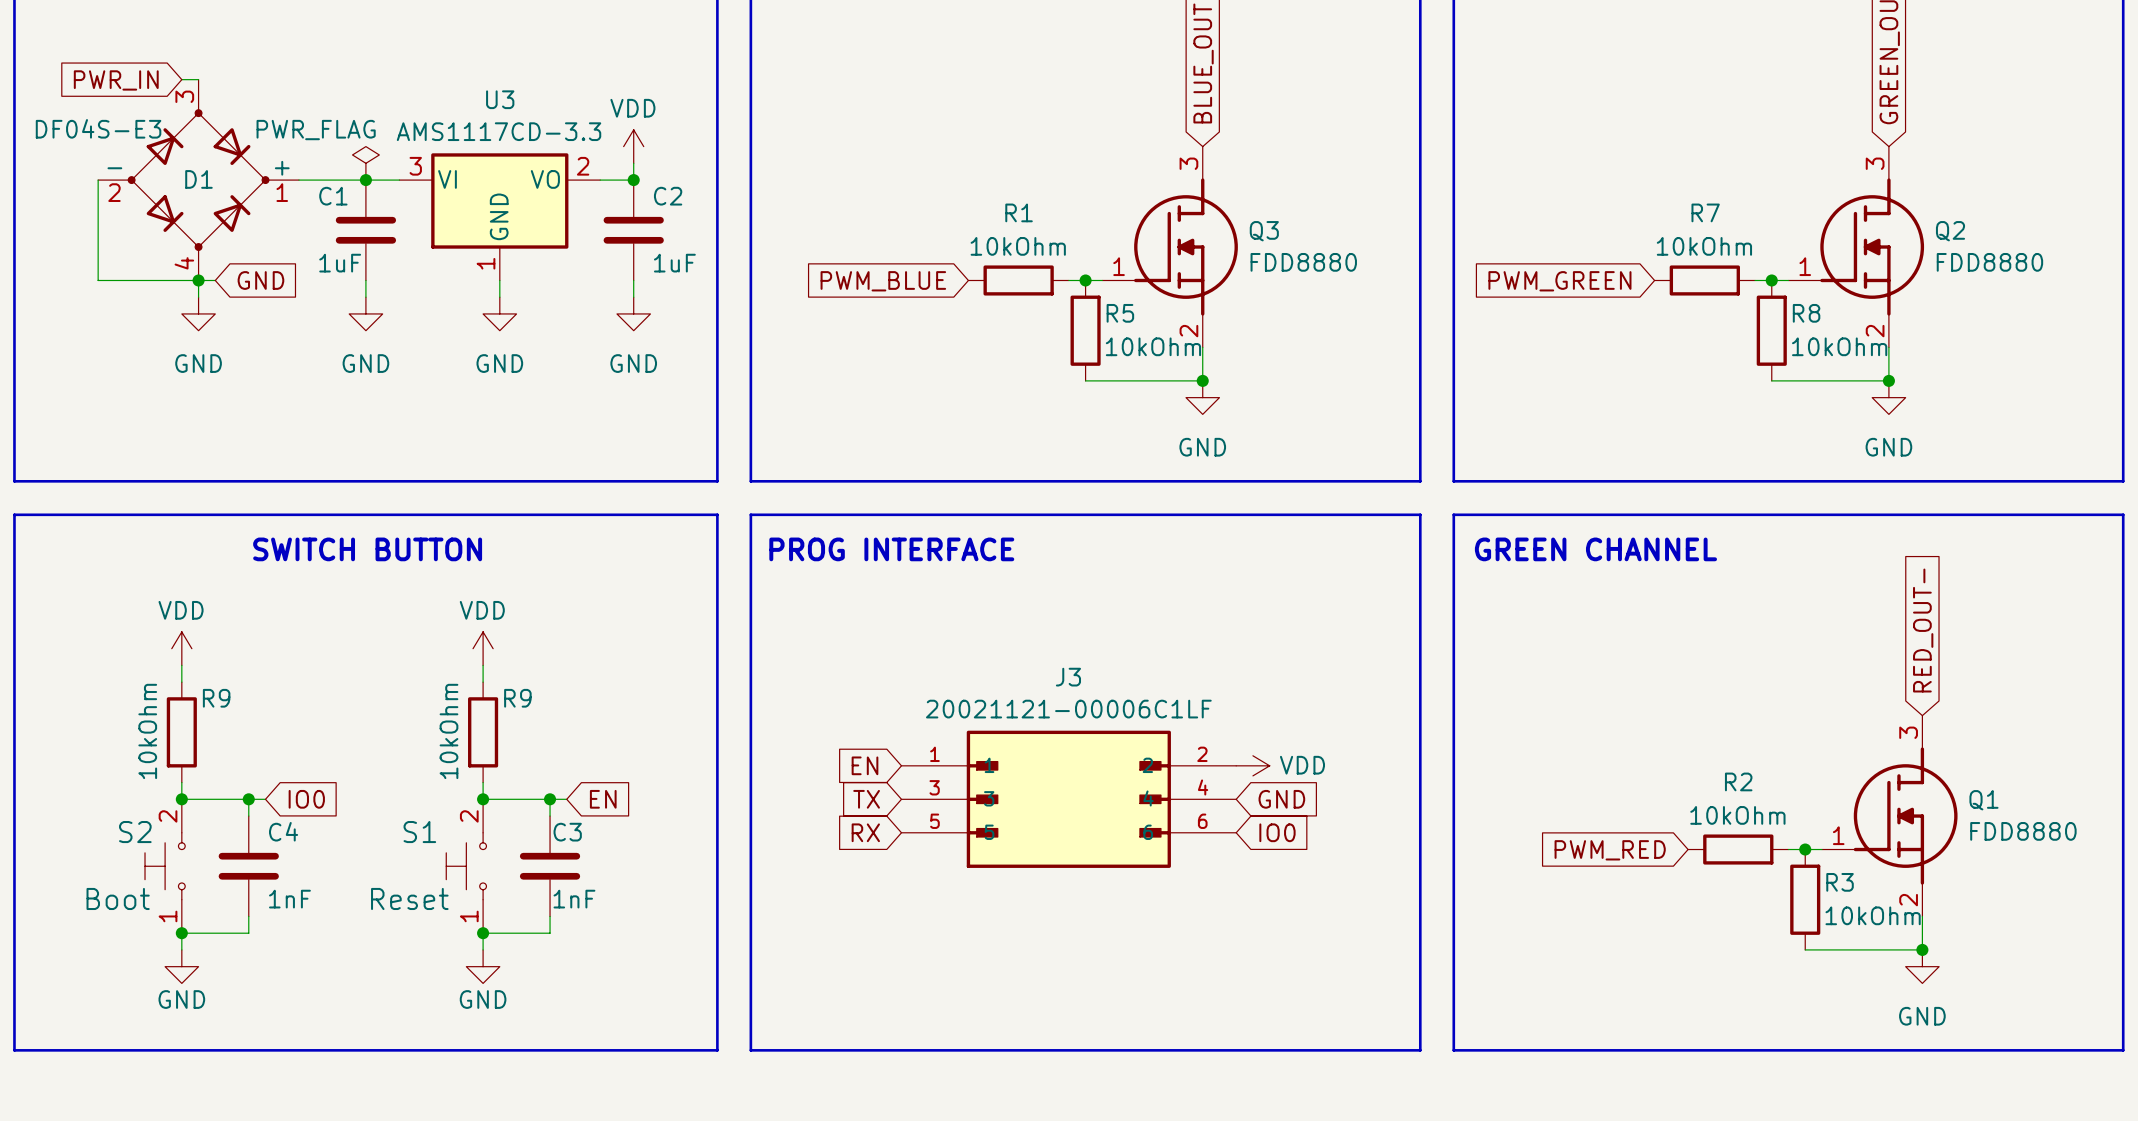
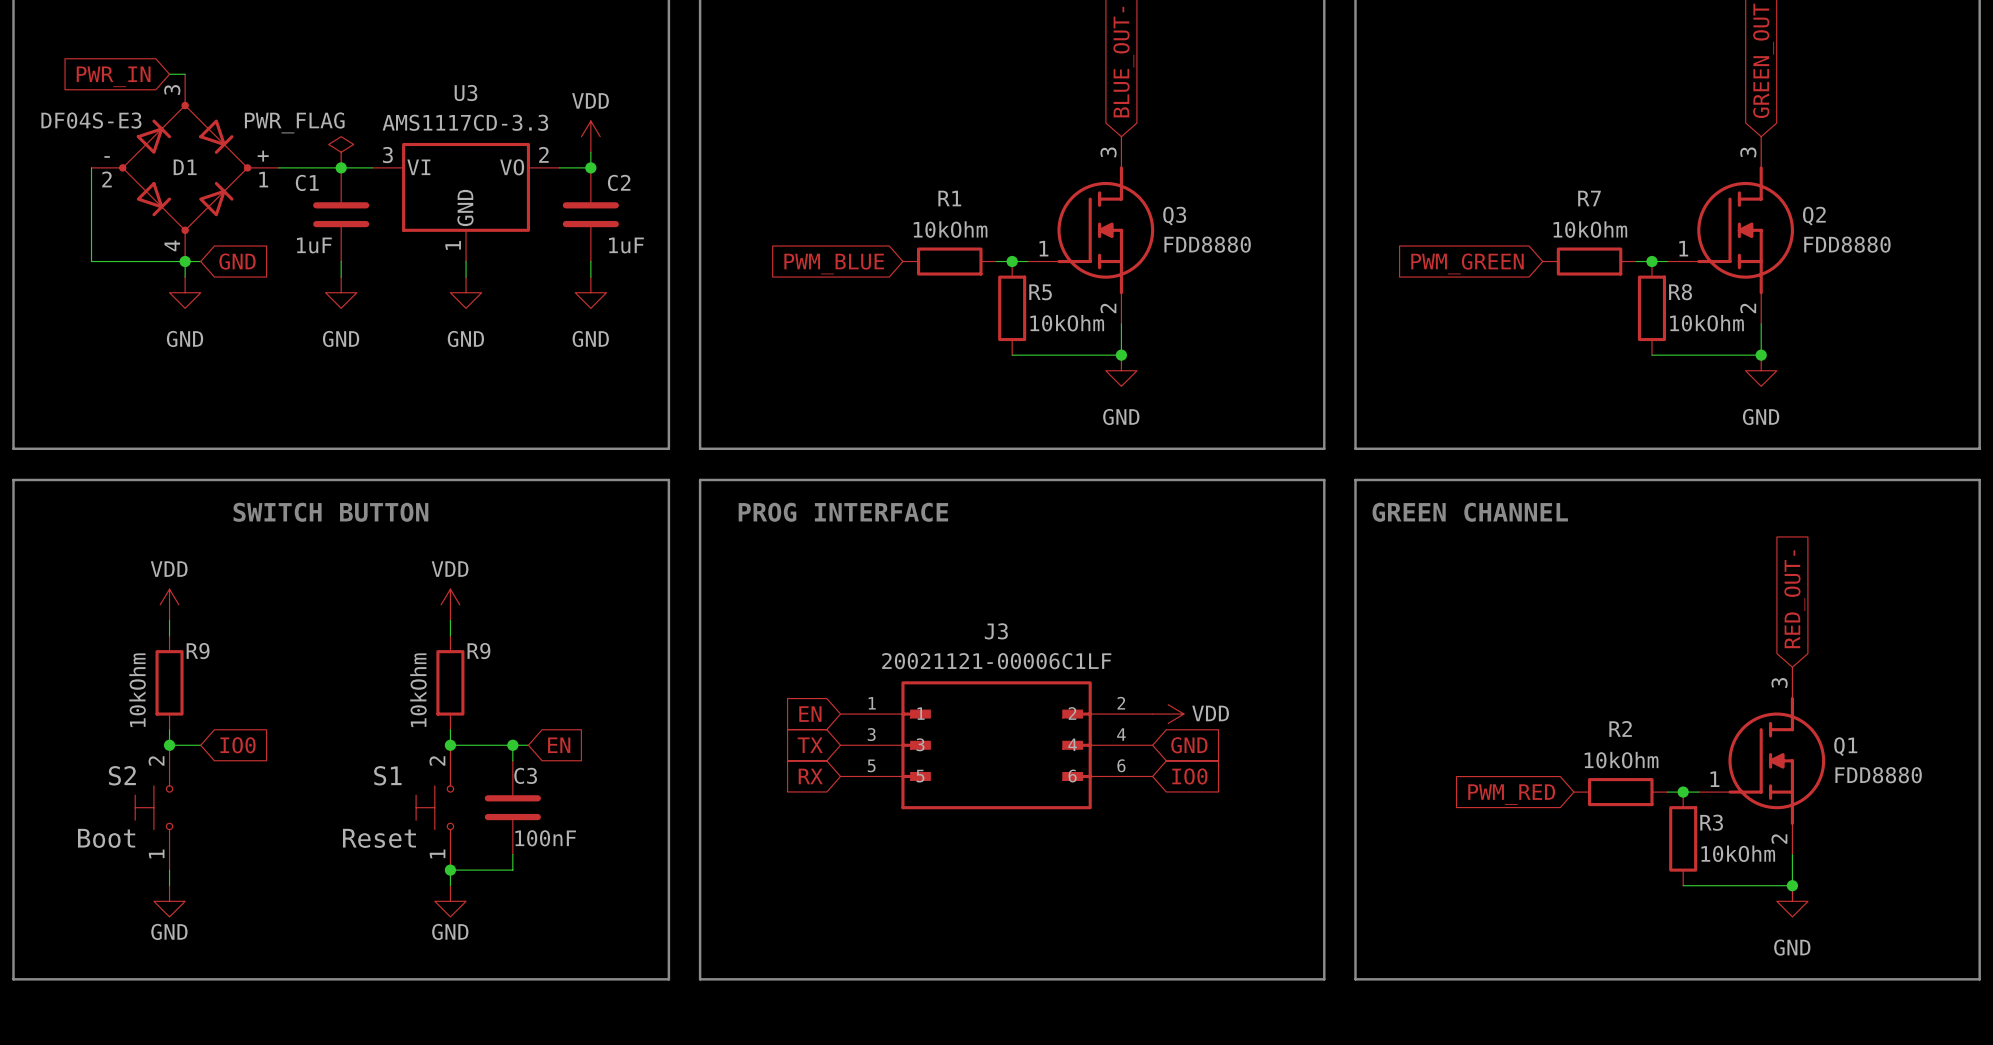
wire: (215, 799) (265, 799) -> none
wire: (248, 799) (248, 816) -> none
junction: (248, 799) -> none
global label position: IO0 (306, 799) -> IO0 (237, 745)
C4: 1nF (248, 866) -> none
C3 value: 1nF (574, 899) -> 100nF (545, 838)
wire: (248, 916) (248, 933) (181, 933) -> none
junction: (181, 933) -> none

